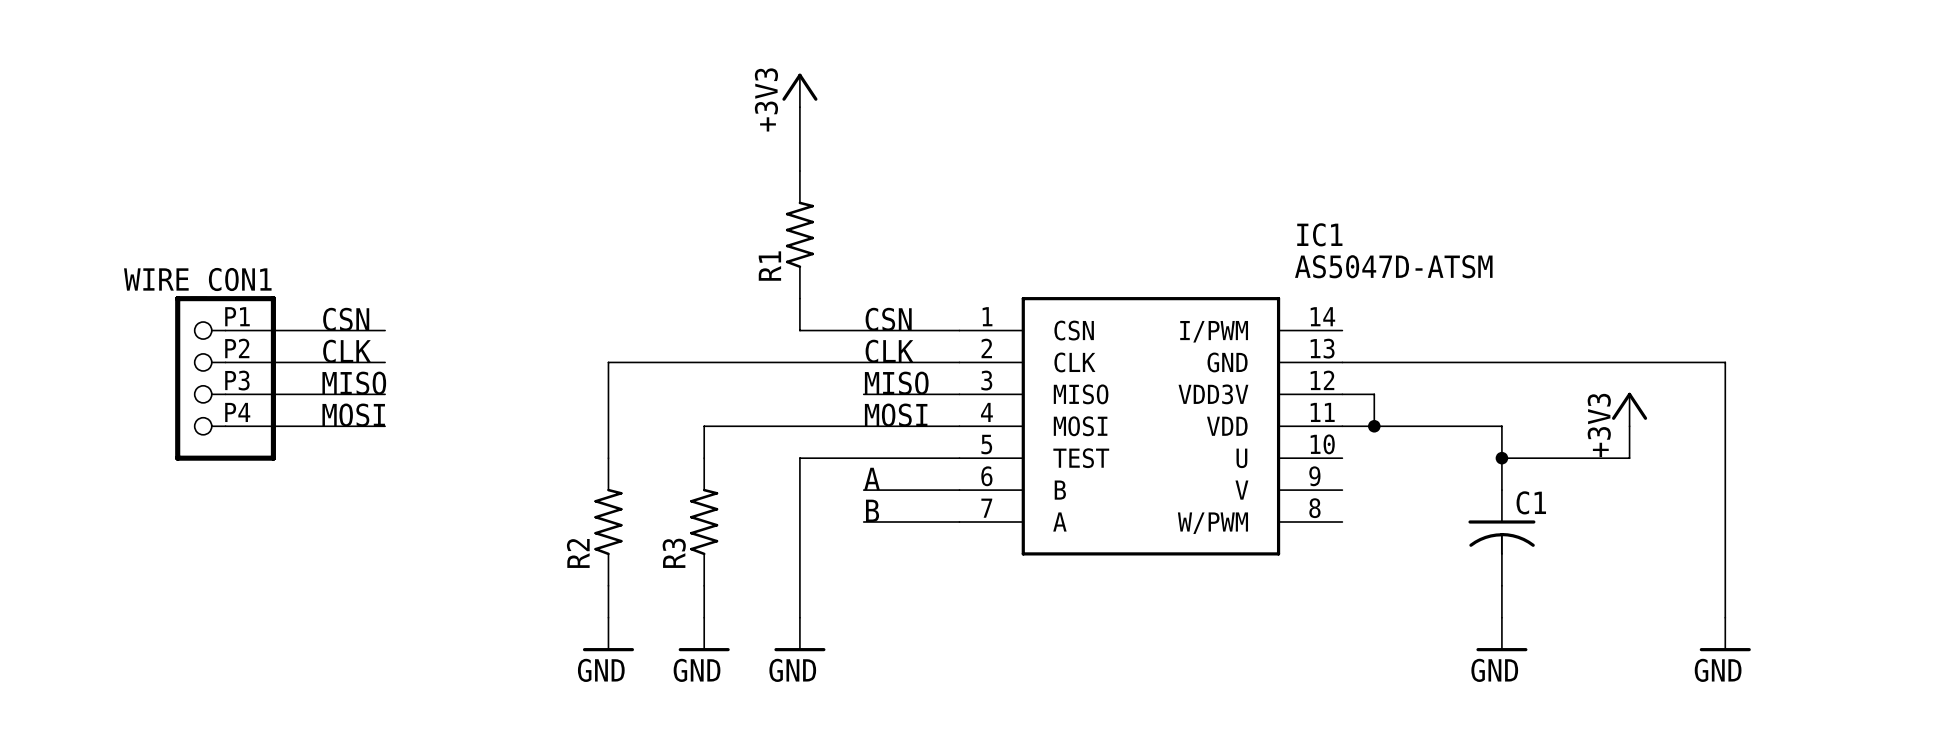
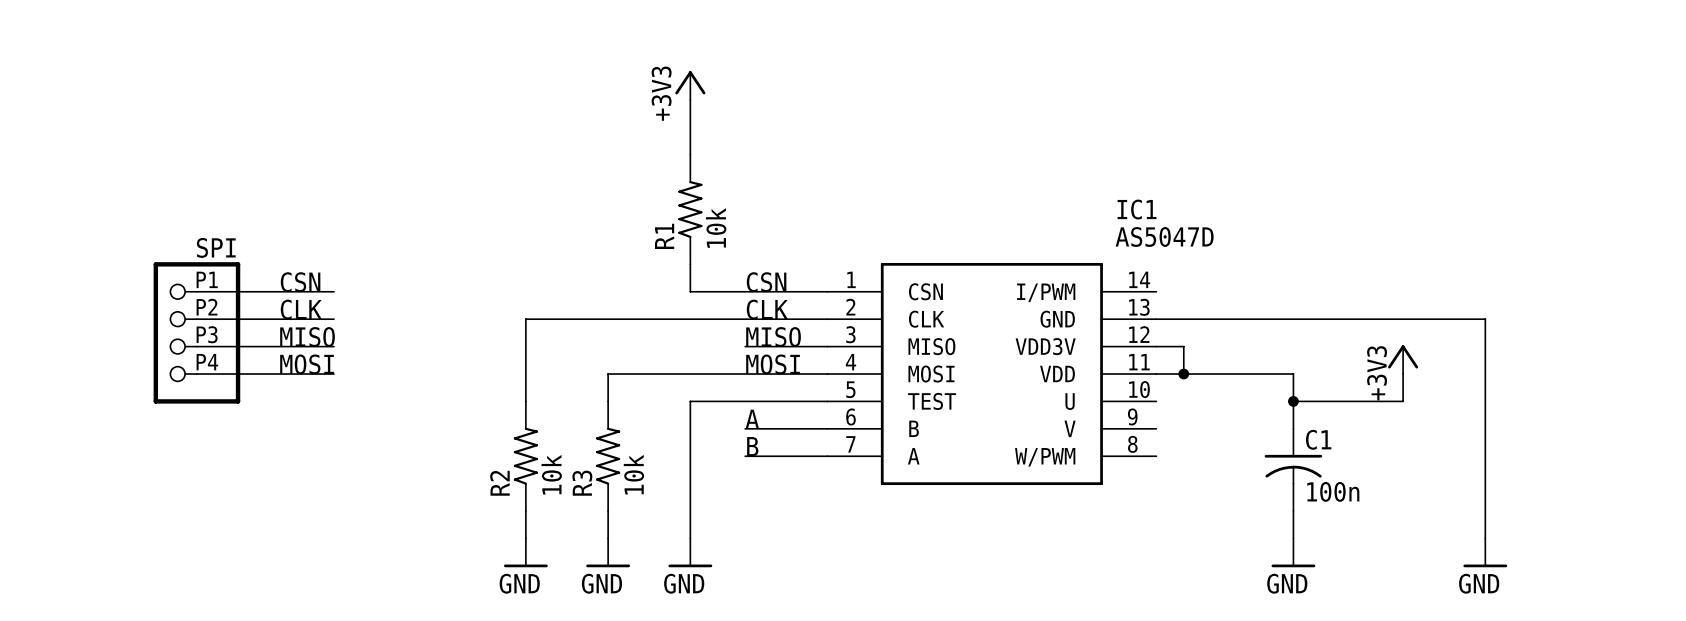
R1 value: none -> 10k (716, 228)
IC1 value: AS5047D-ATSM (1393, 266) -> AS5047D (1164, 236)
WIRE_CON1 name: WIRE_CON1 (197, 282) -> SPI (216, 247)
R2 value: none -> 10k (551, 474)
R3 value: none -> 10k (633, 474)
C1 value: none -> 100n (1333, 491)

